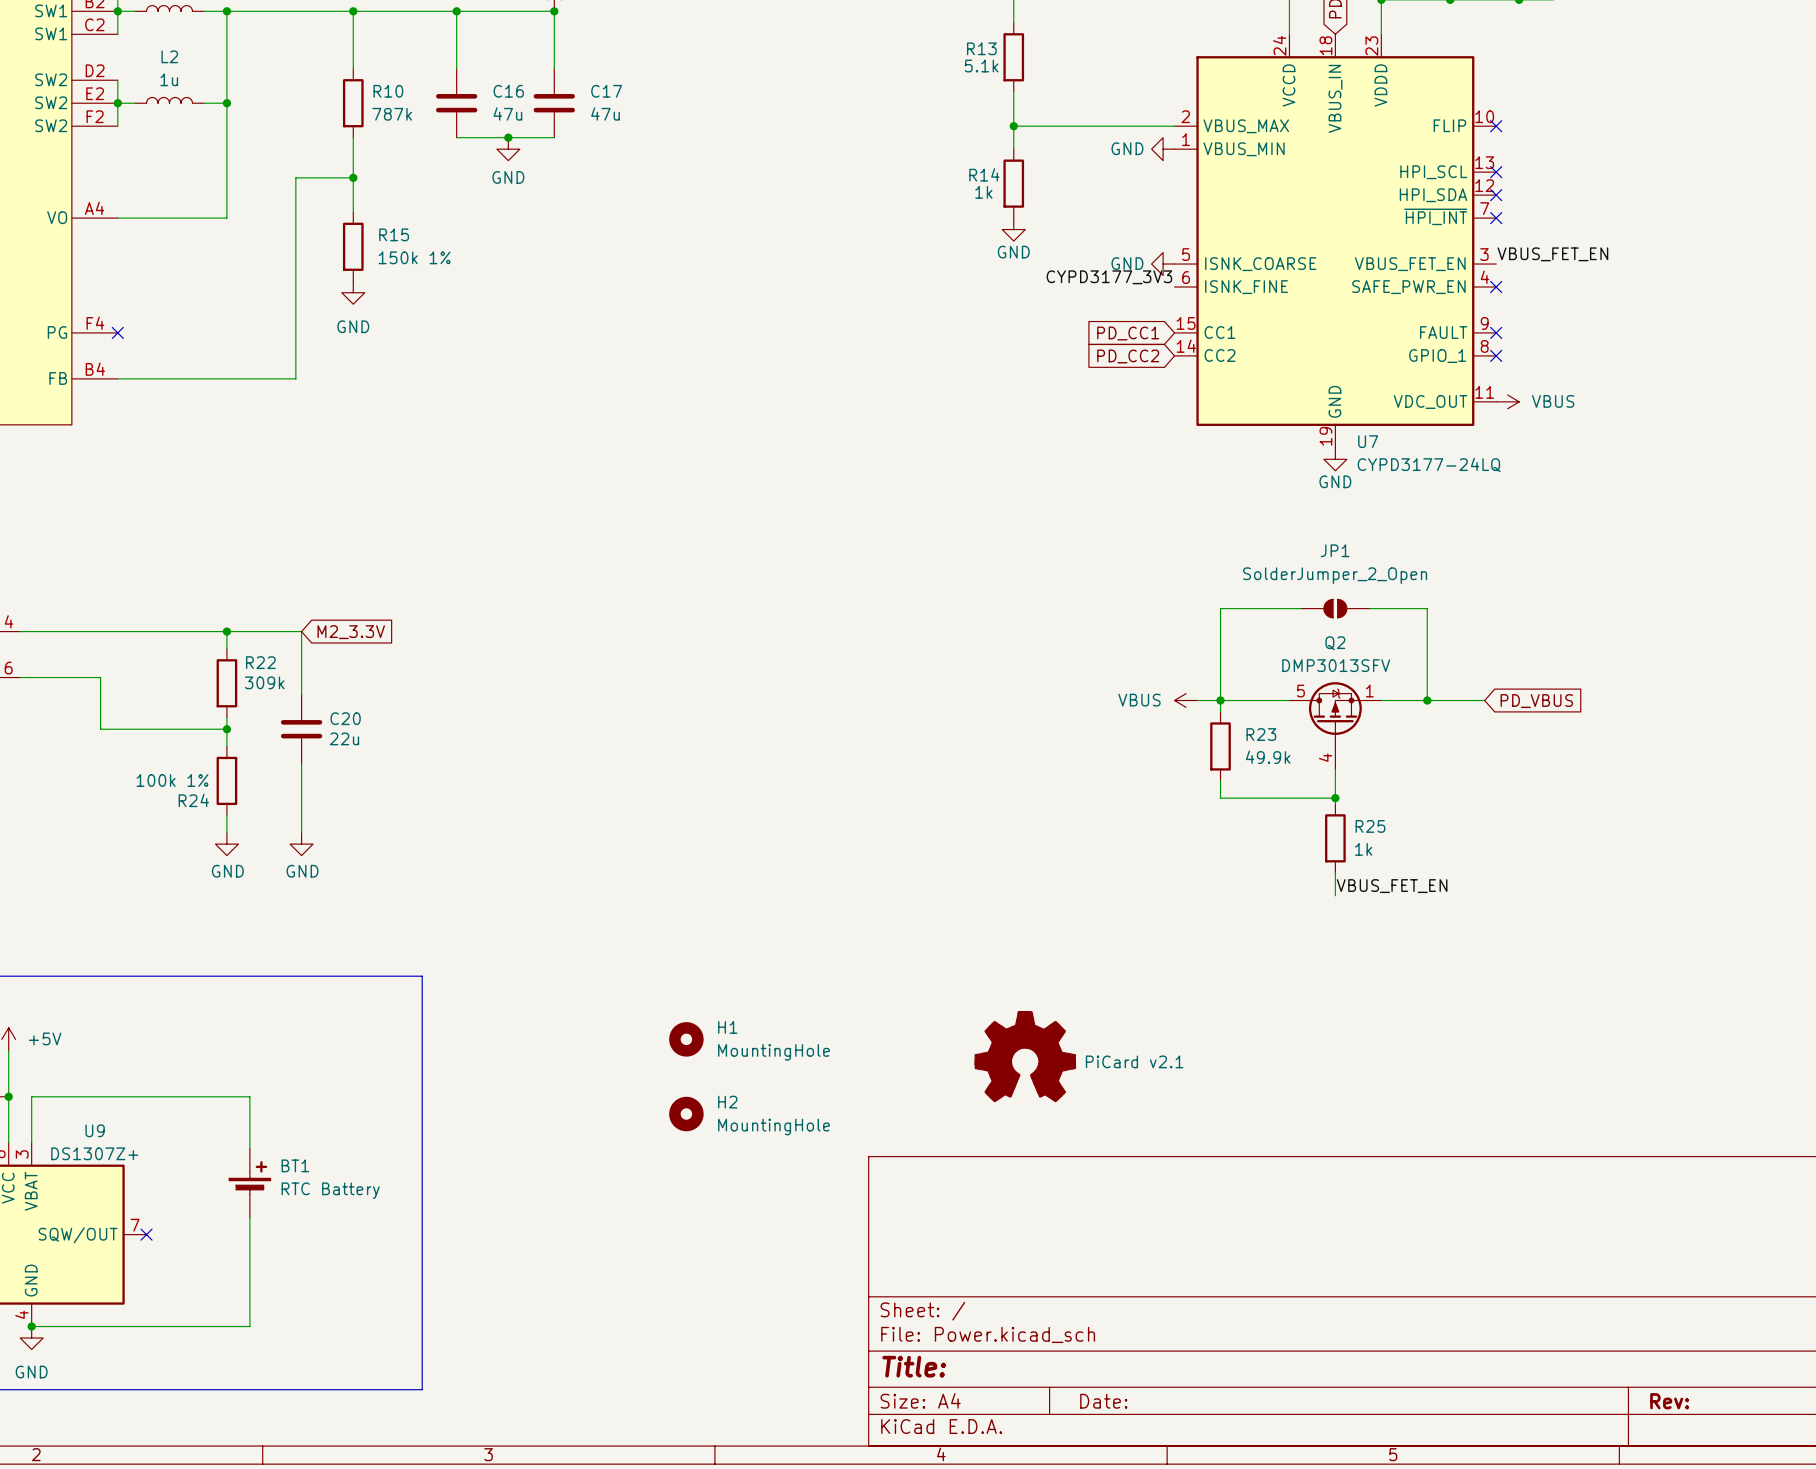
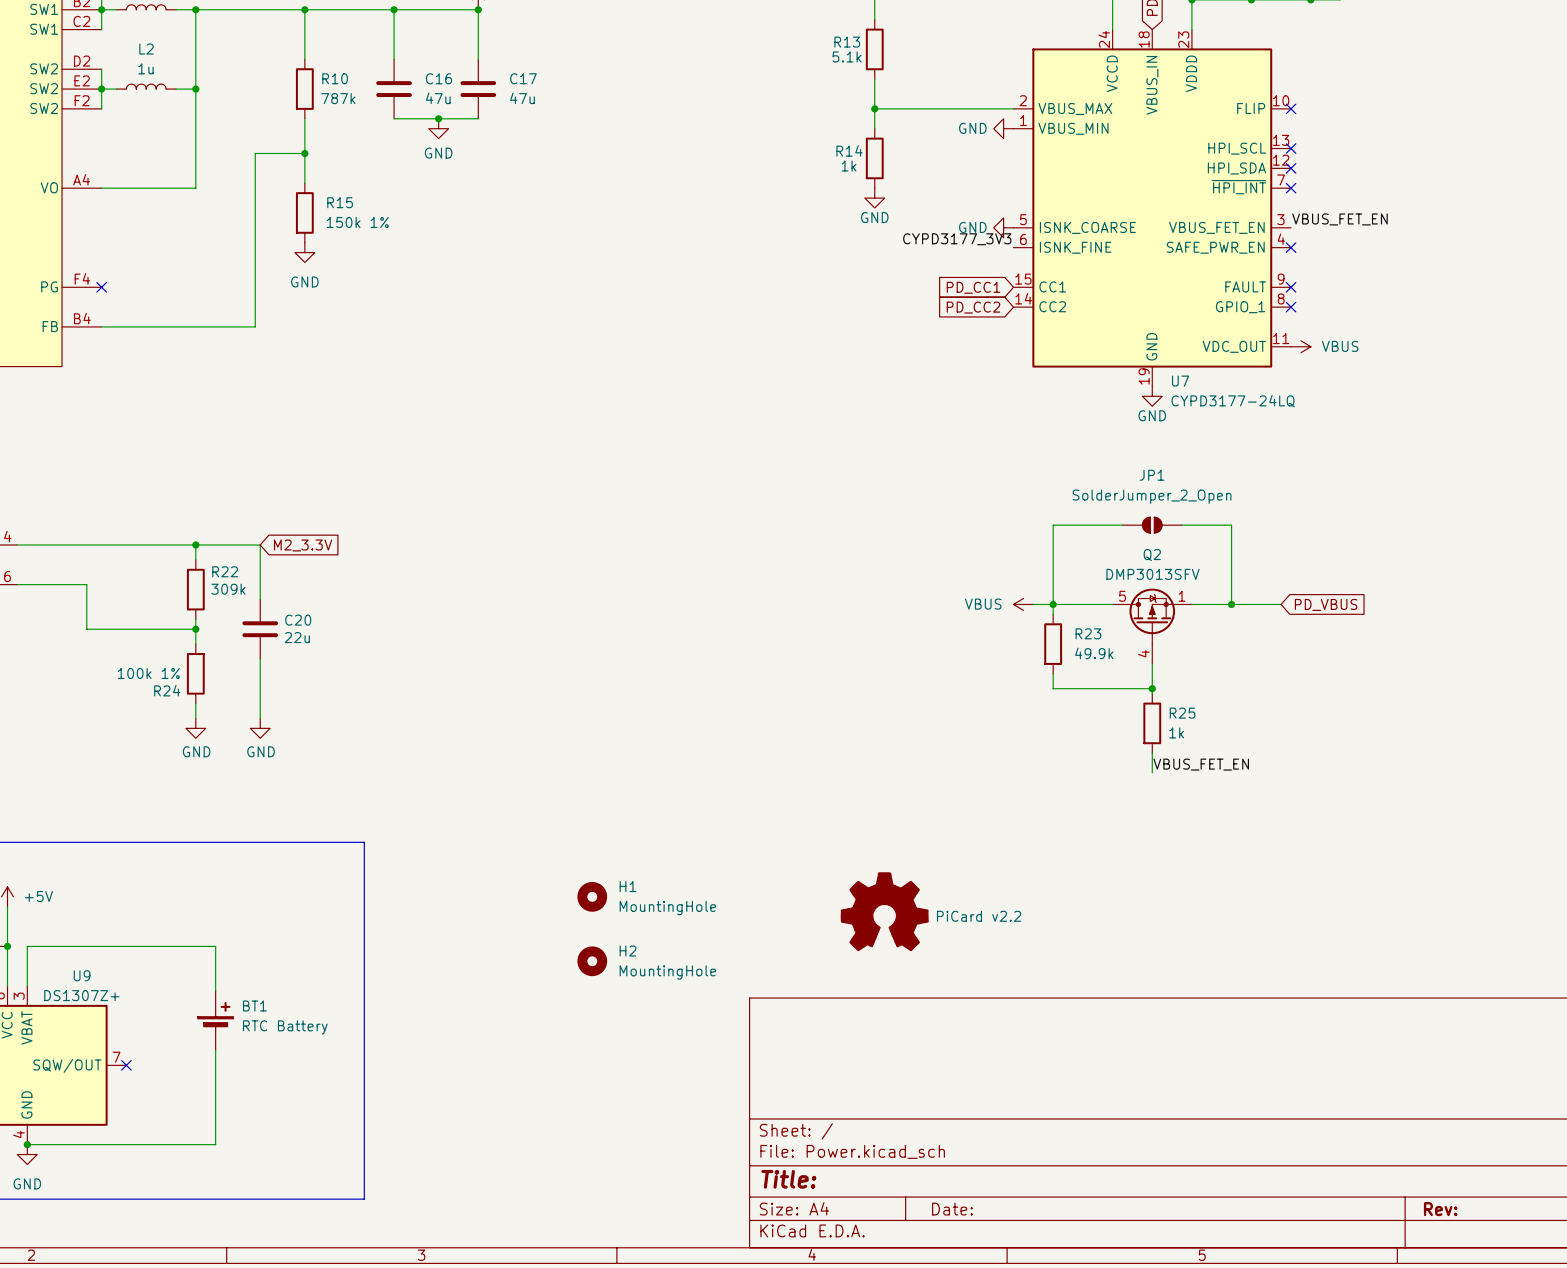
part value: PiCard v2.1 (1134, 1061) -> PiCard v2.2 (979, 916)

